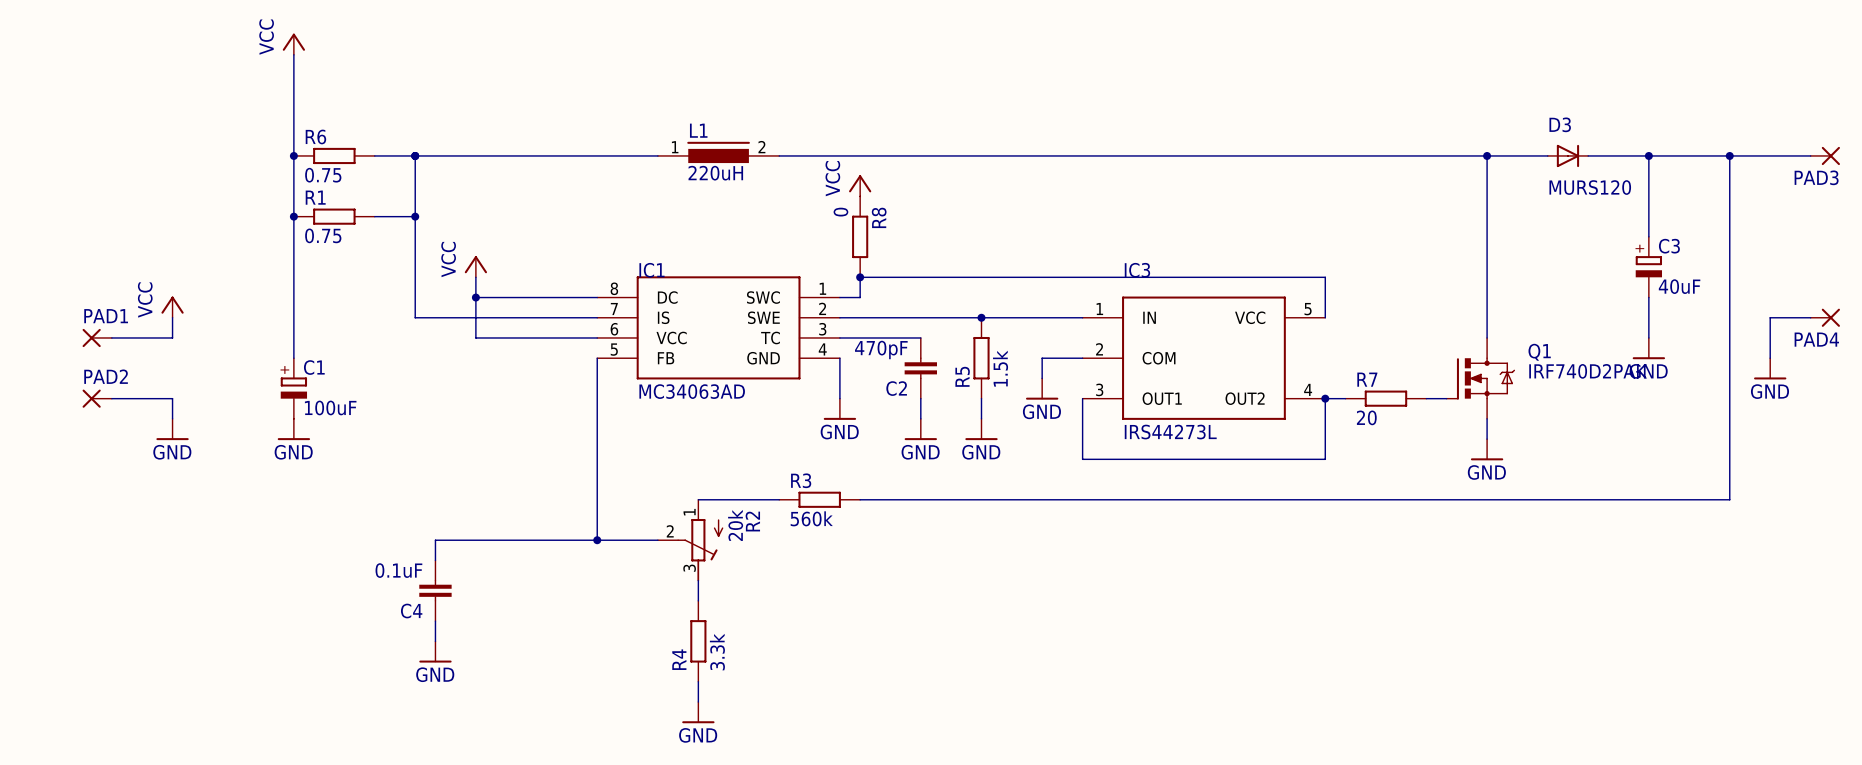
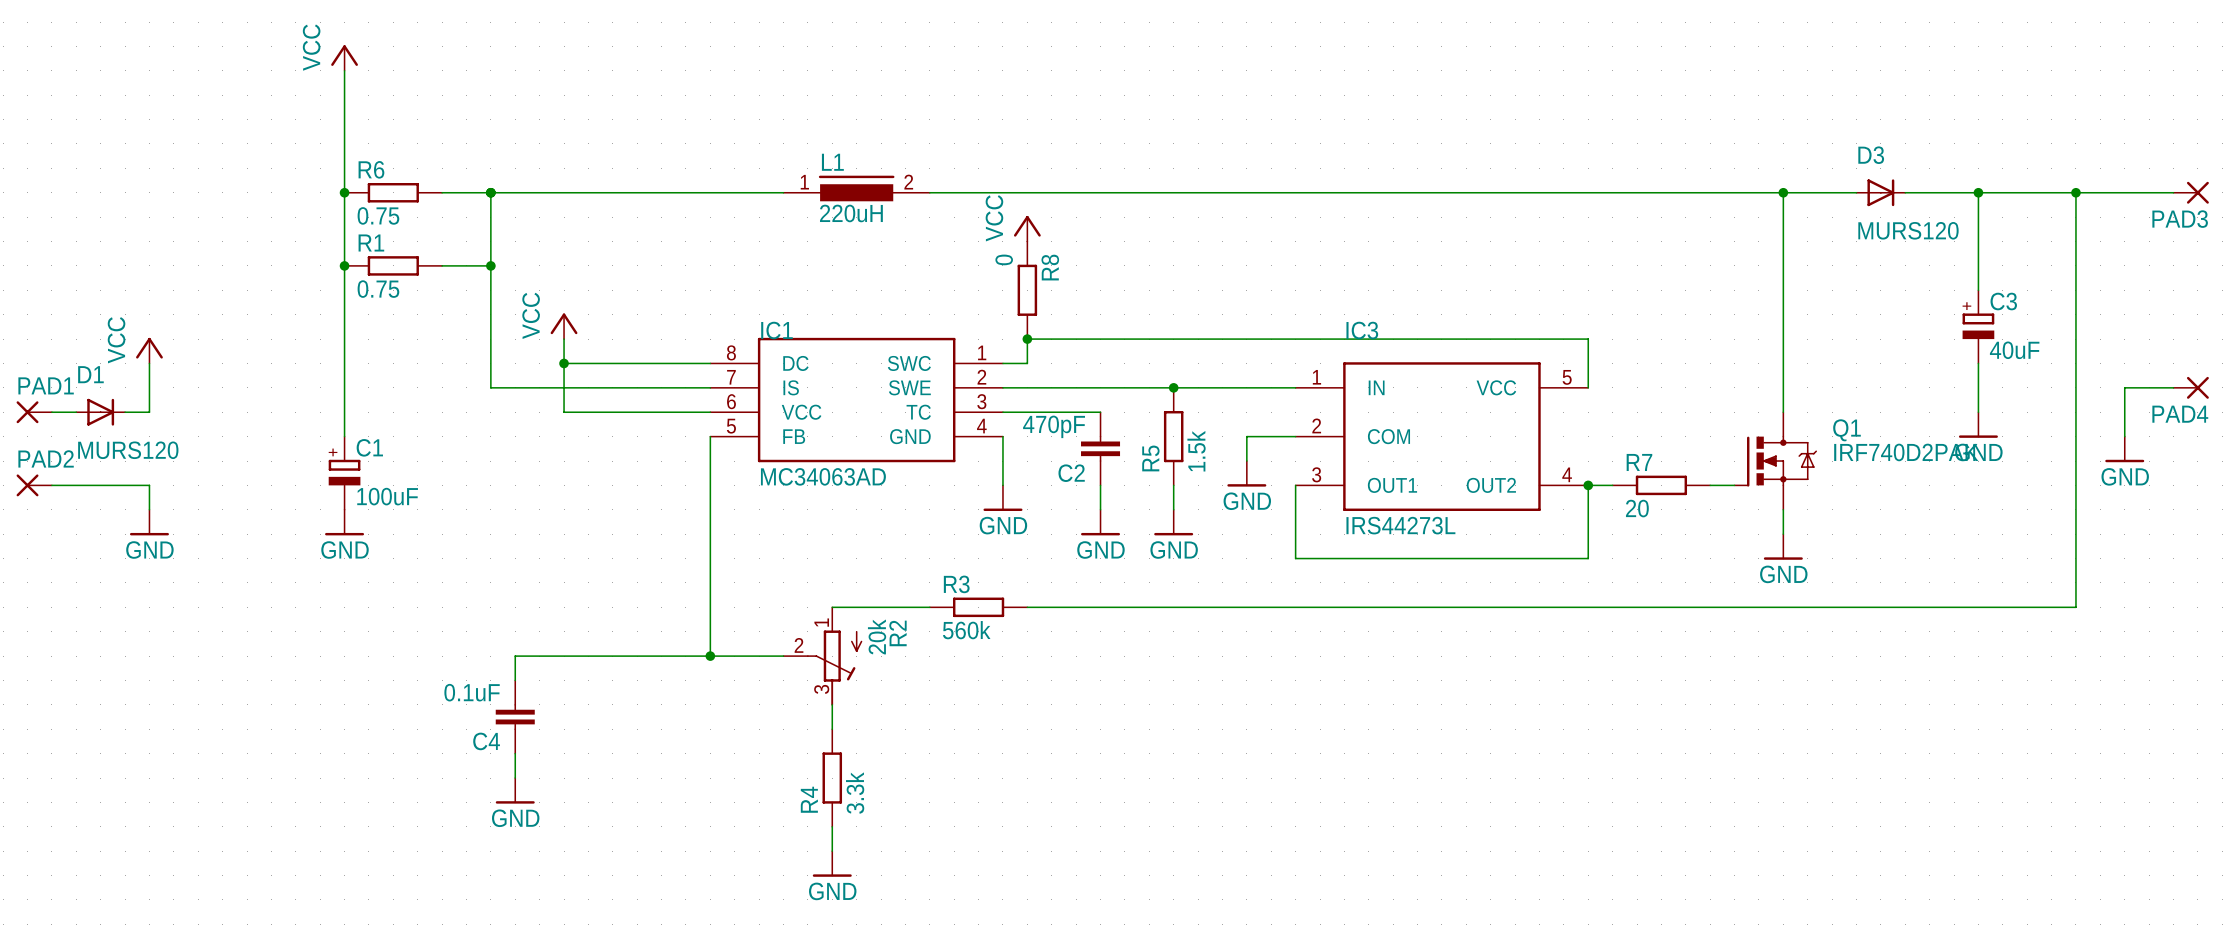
power symbol position: VCC (172, 307) -> VCC (149, 350)
wire: (172, 317) (172, 337) (132, 337) -> (149, 363) (149, 412)
wire: none -> (51, 412) (76, 412)
D1: none -> MURS120 (100, 412)
PAD1 position: (97, 337) -> (34, 412)
wire: none -> (51, 485) (125, 485)
PAD2 position: (97, 398) -> (34, 485)
wire: (132, 398) (172, 398) (172, 418) -> (149, 485) (149, 509)
power symbol position: GND (172, 429) -> GND (149, 522)

